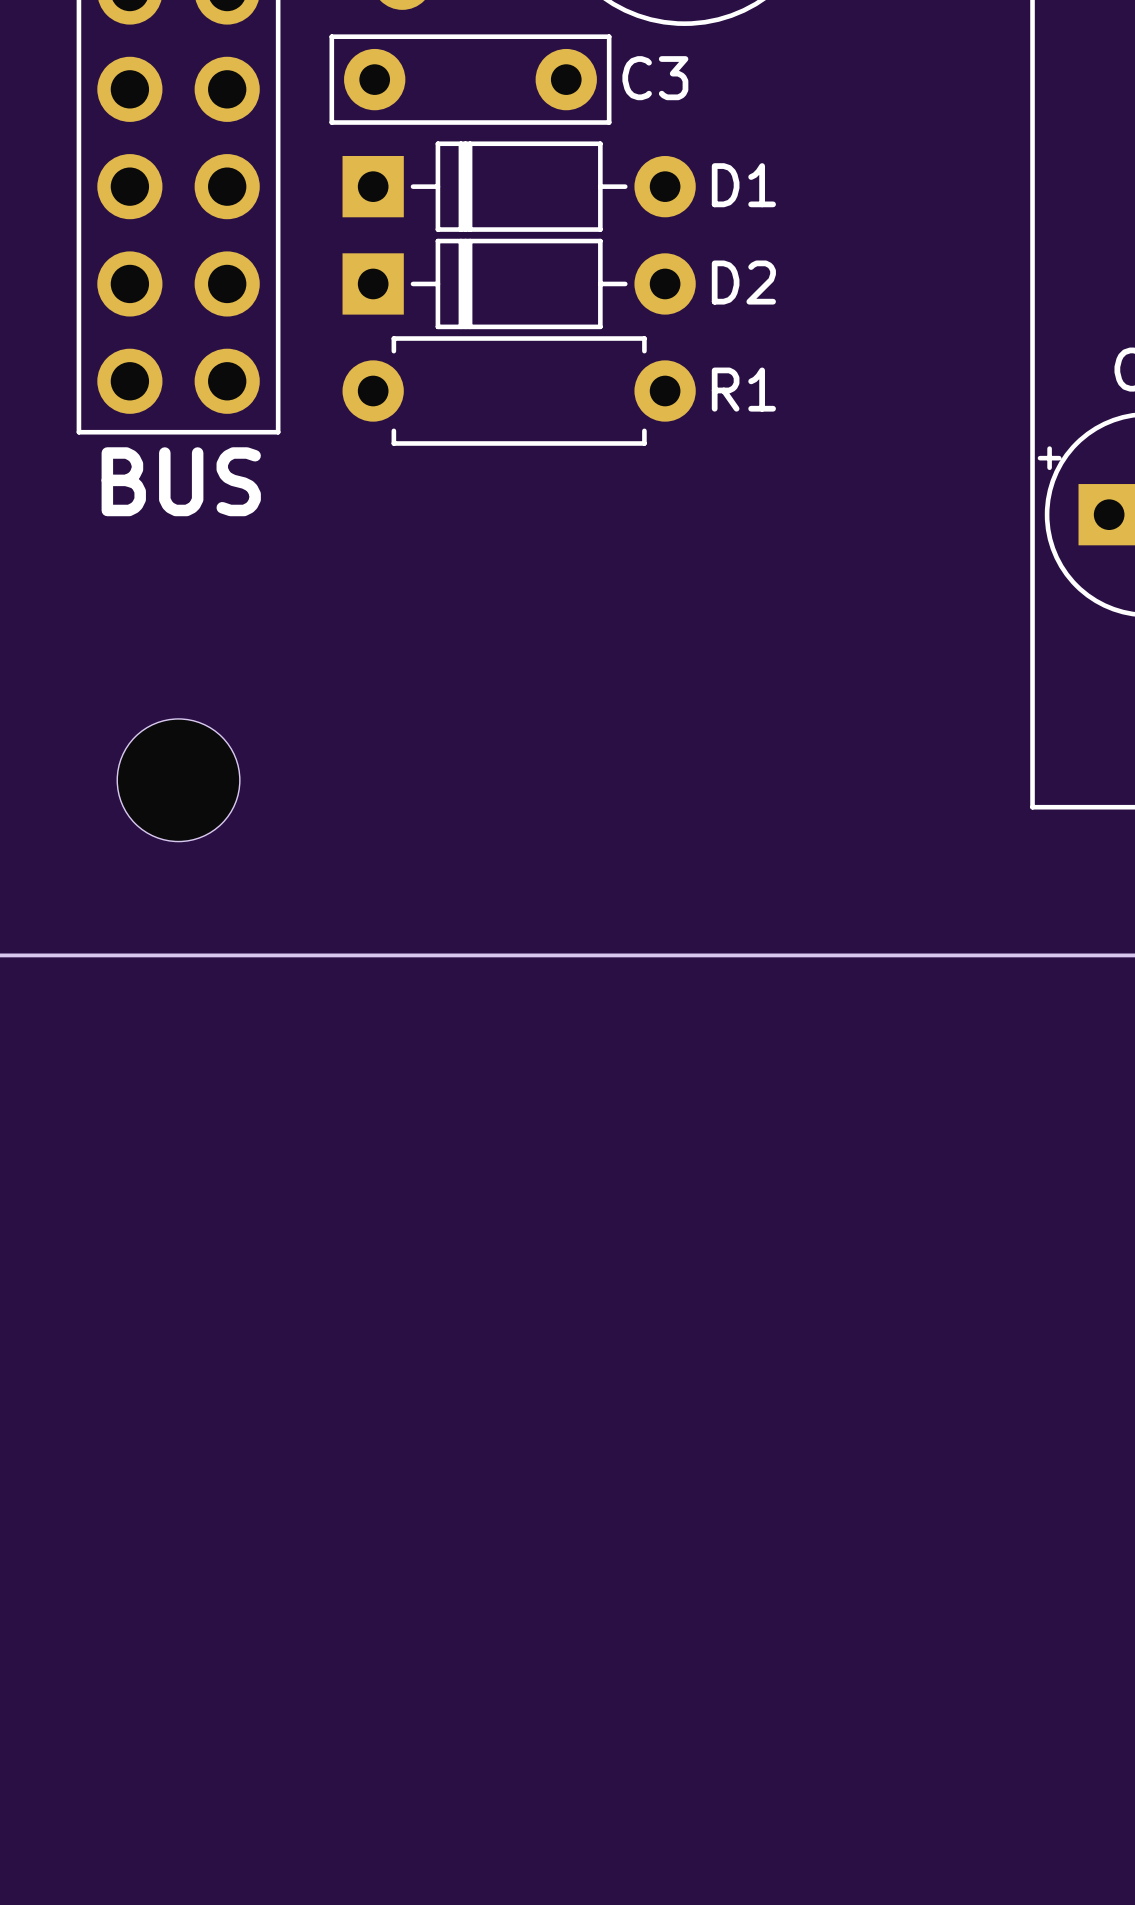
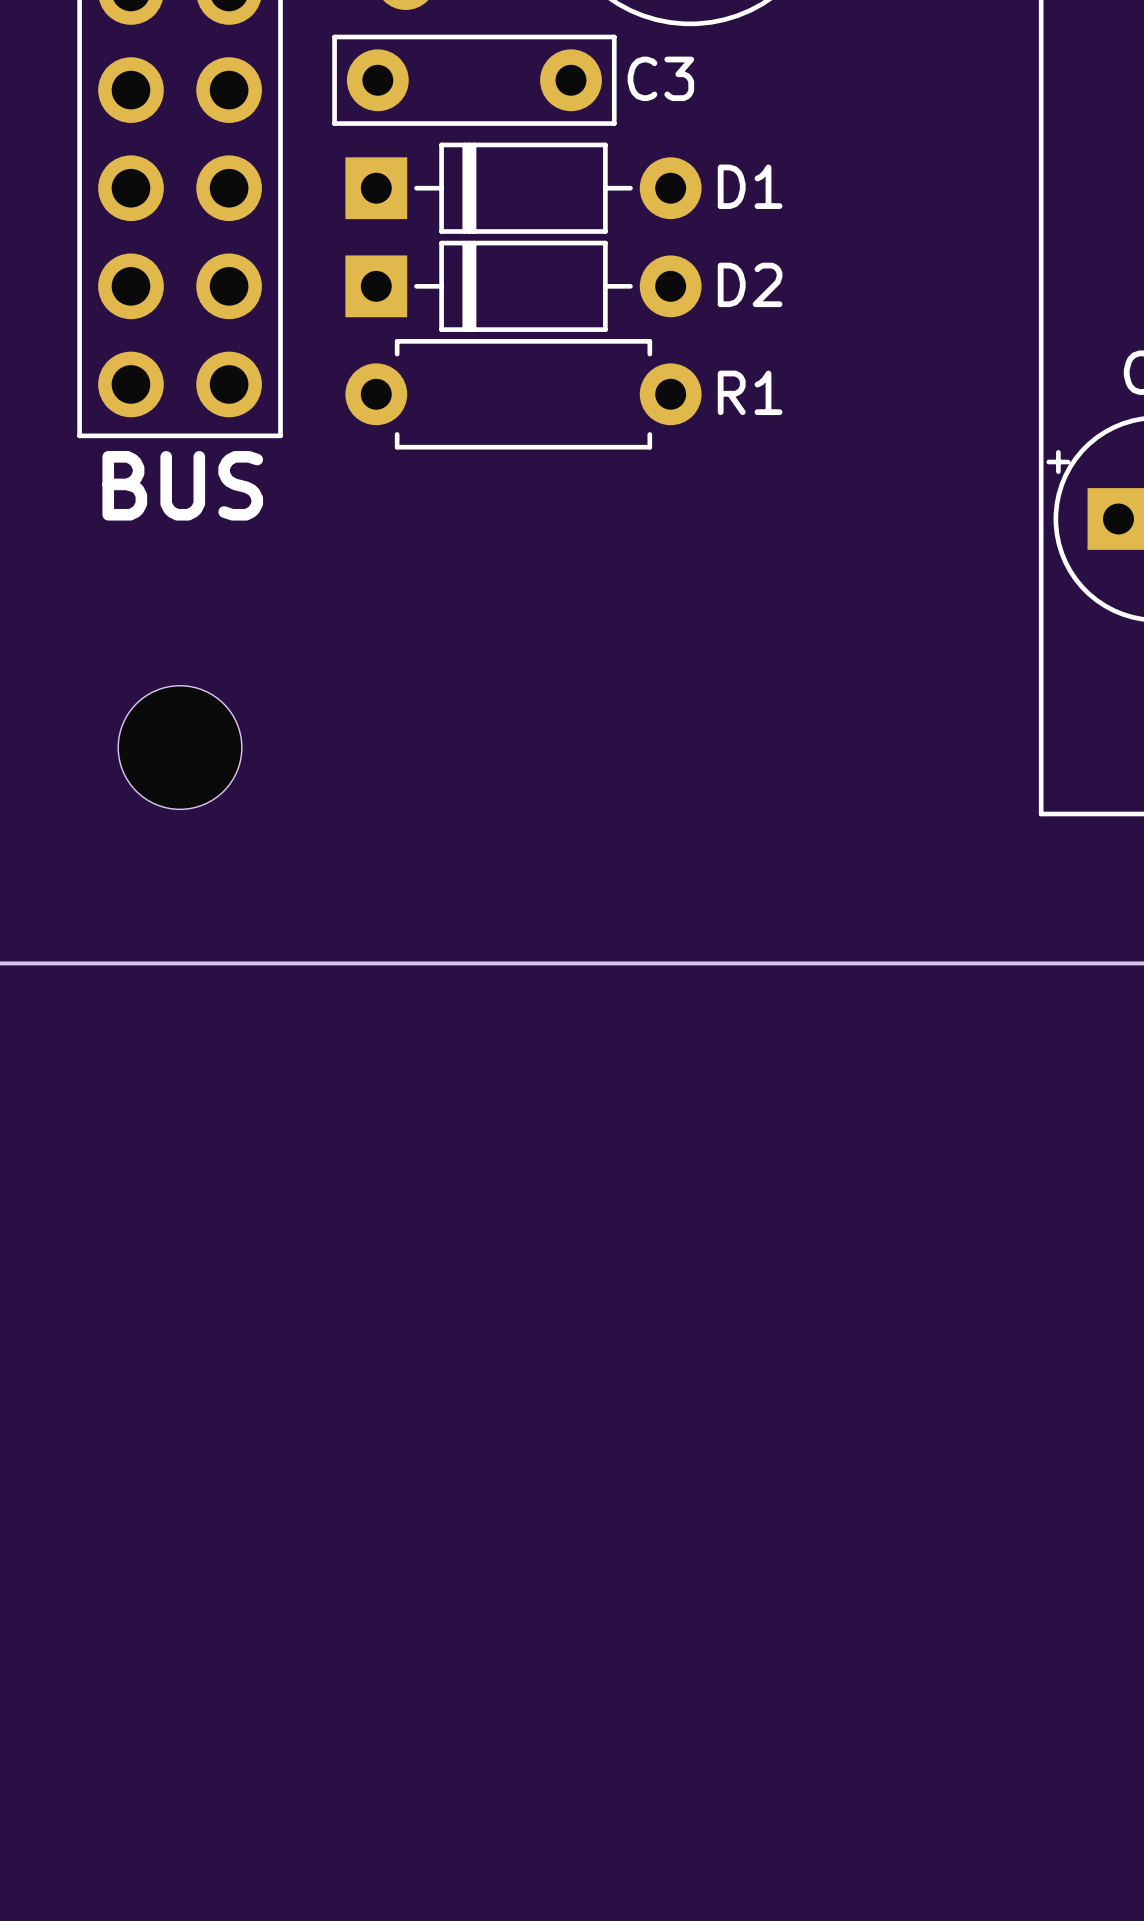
part position: (178, 780) -> (180, 747)

